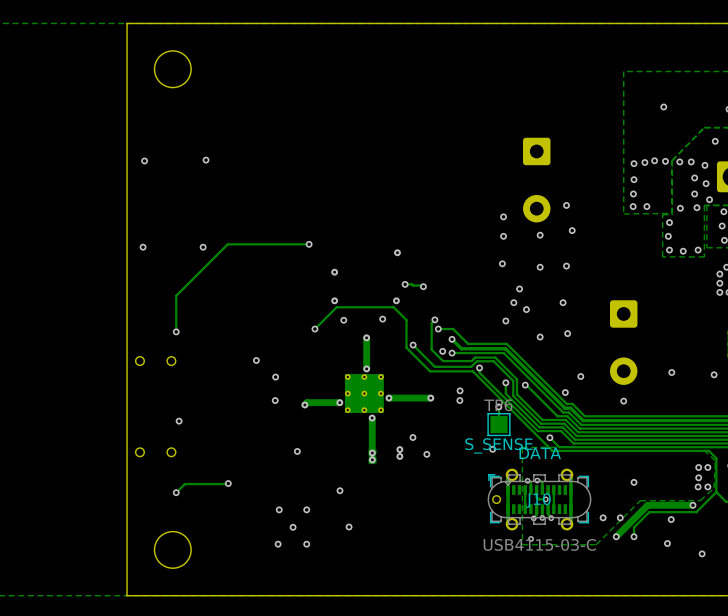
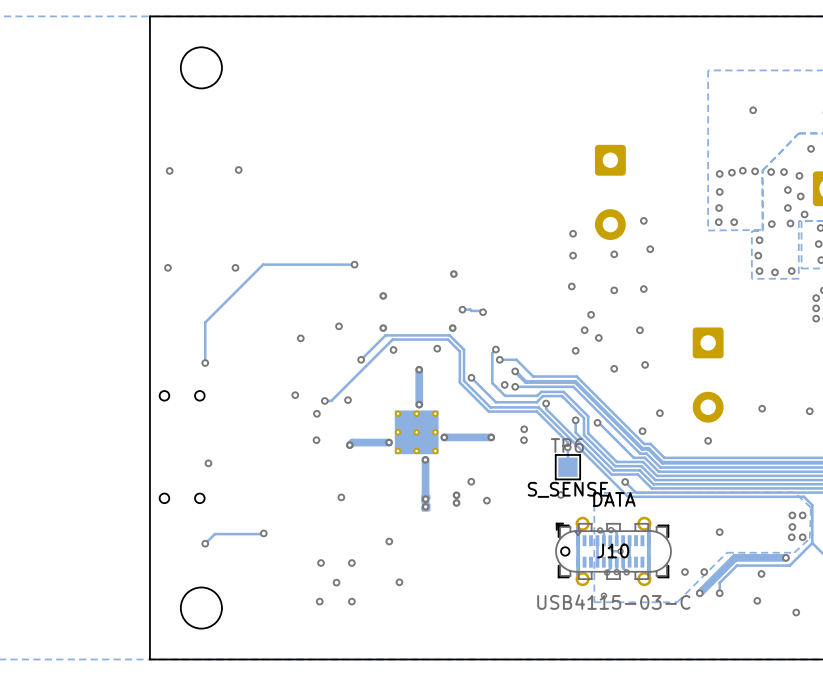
via: none -> (339, 326)
via: none -> (300, 338)
via: none -> (348, 400)
track: none -> (324, 400) (331, 400) (392, 339) (447, 339) (459, 351) (459, 382) (488, 411) (536, 411) (567, 442) (567, 447)
via: none -> (324, 400)

